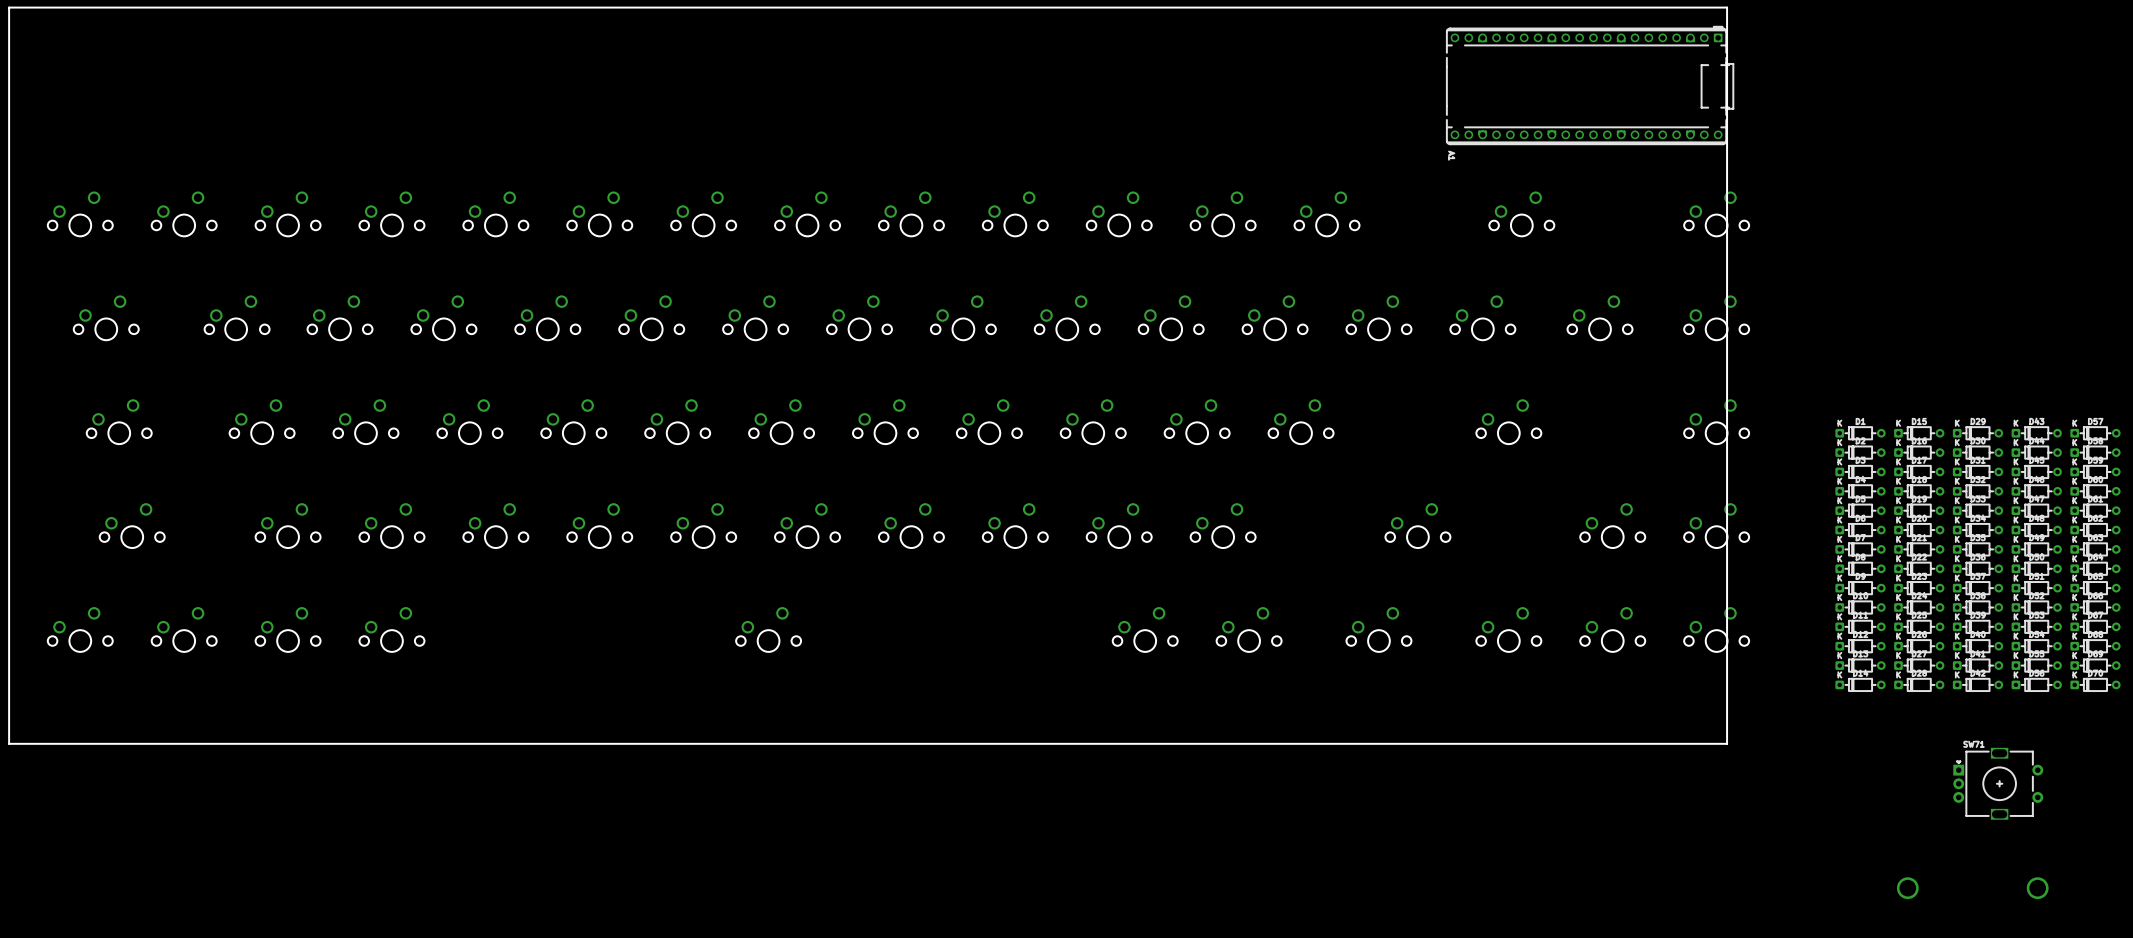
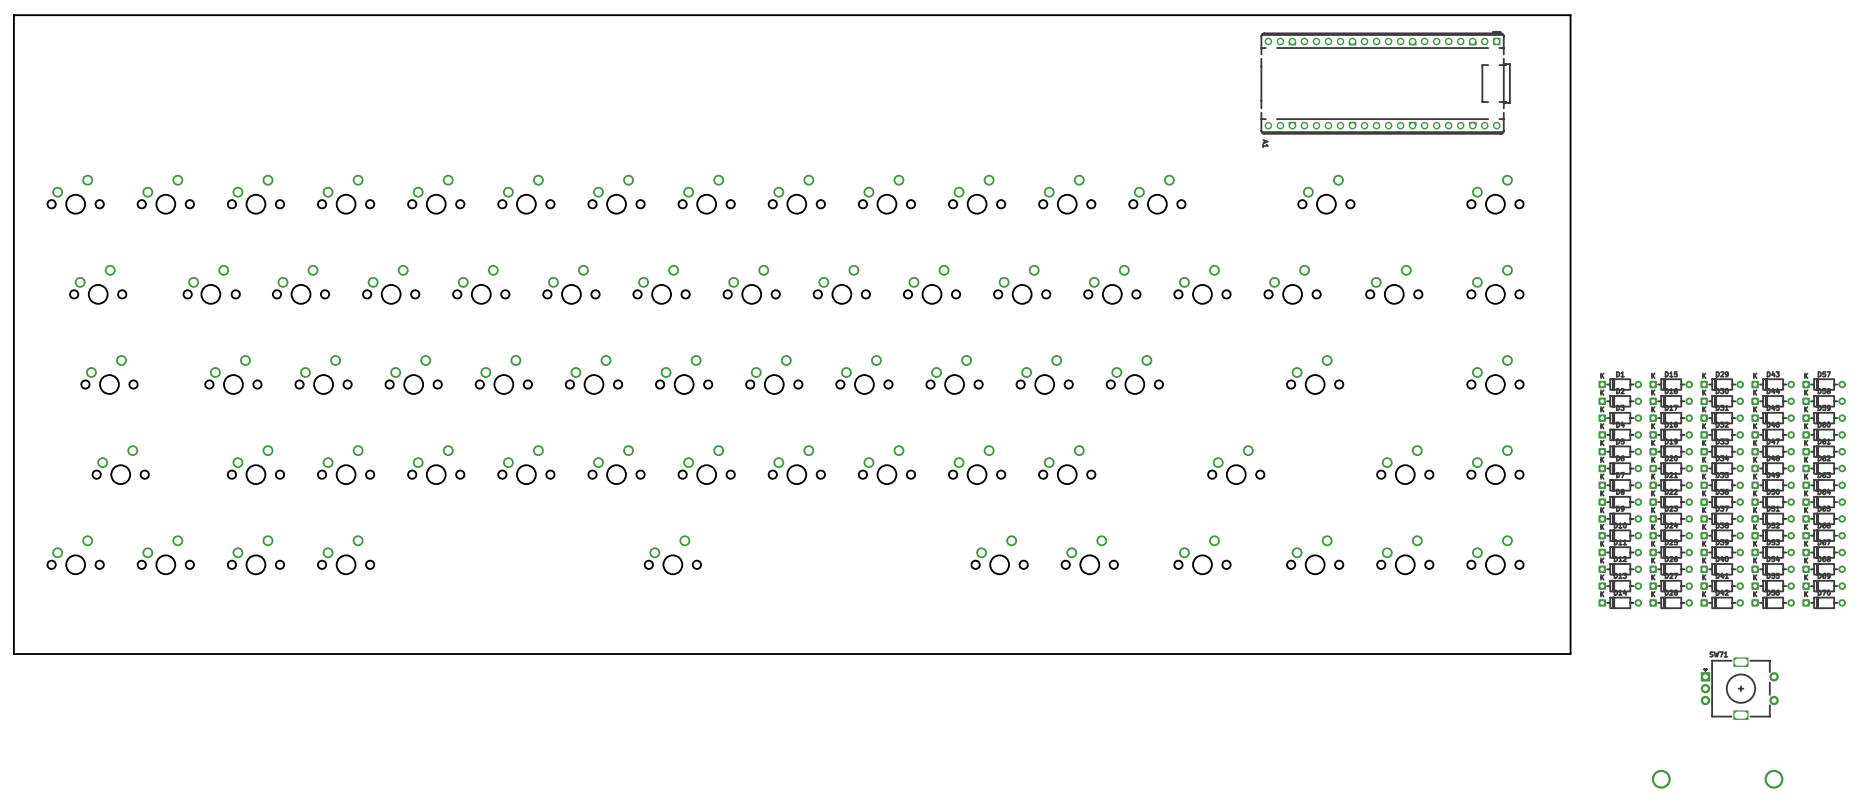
board edge: (1727, 7) (1727, 743) -> (1504, 15) (1570, 15) (1570, 654) (1504, 654)

